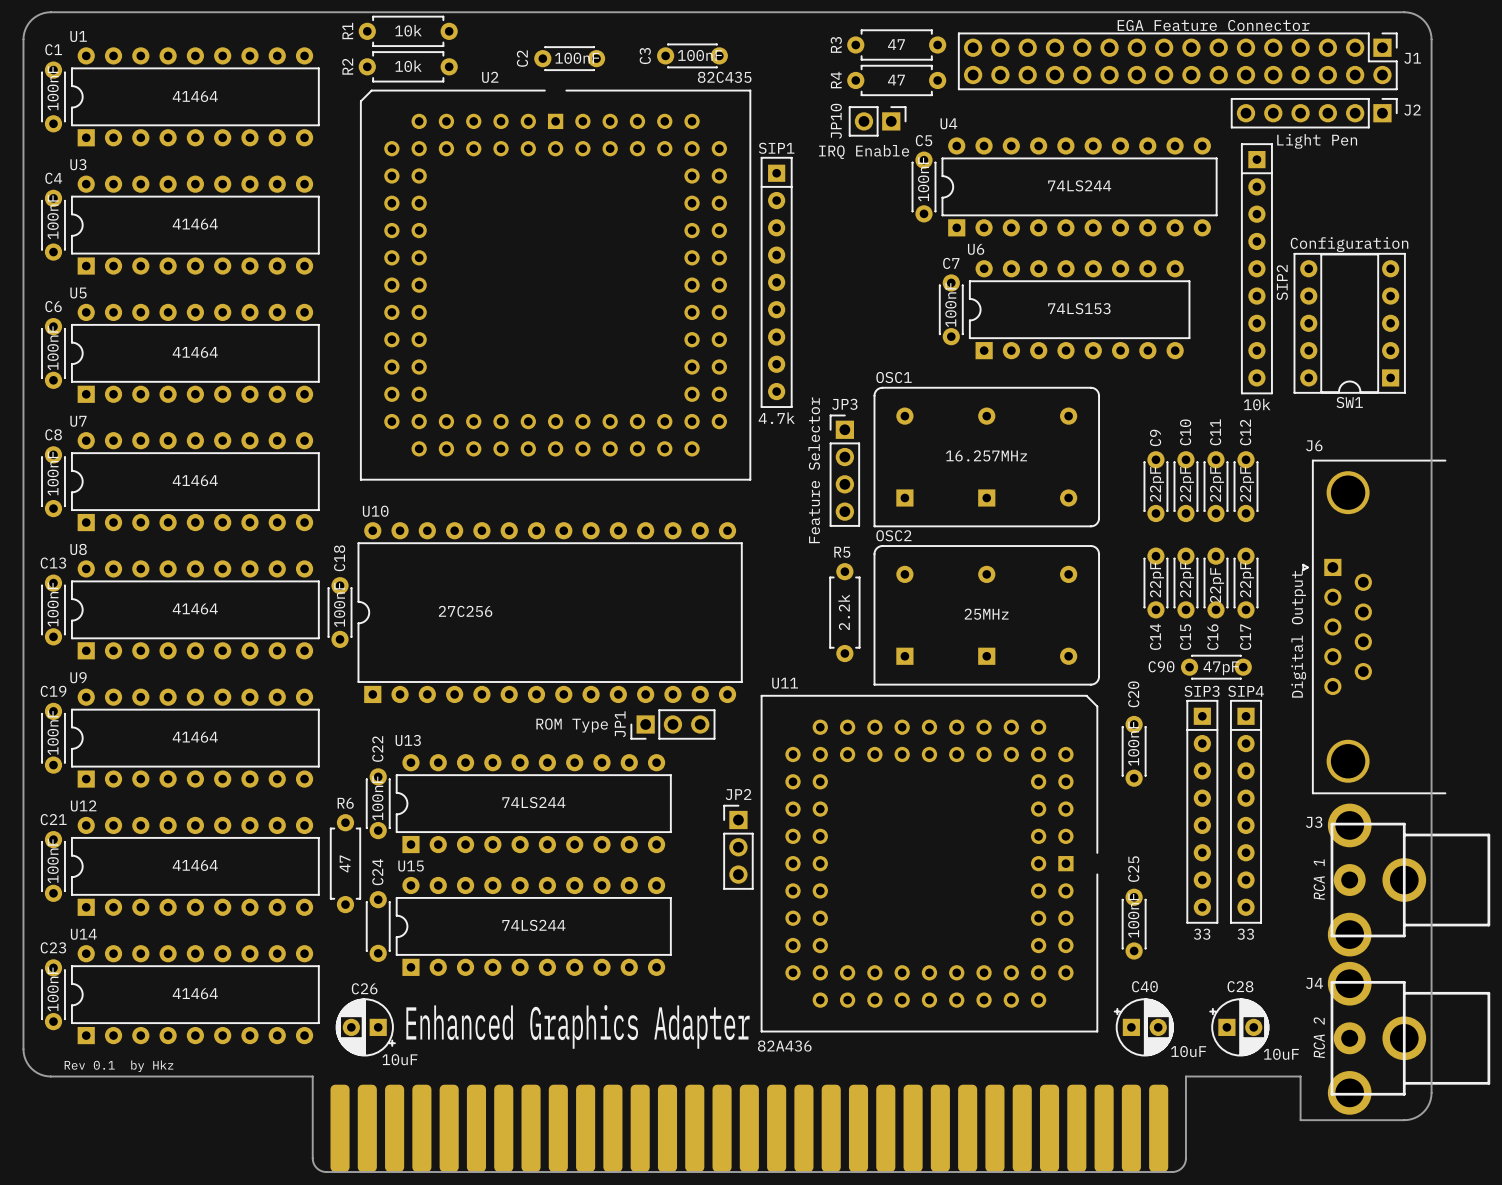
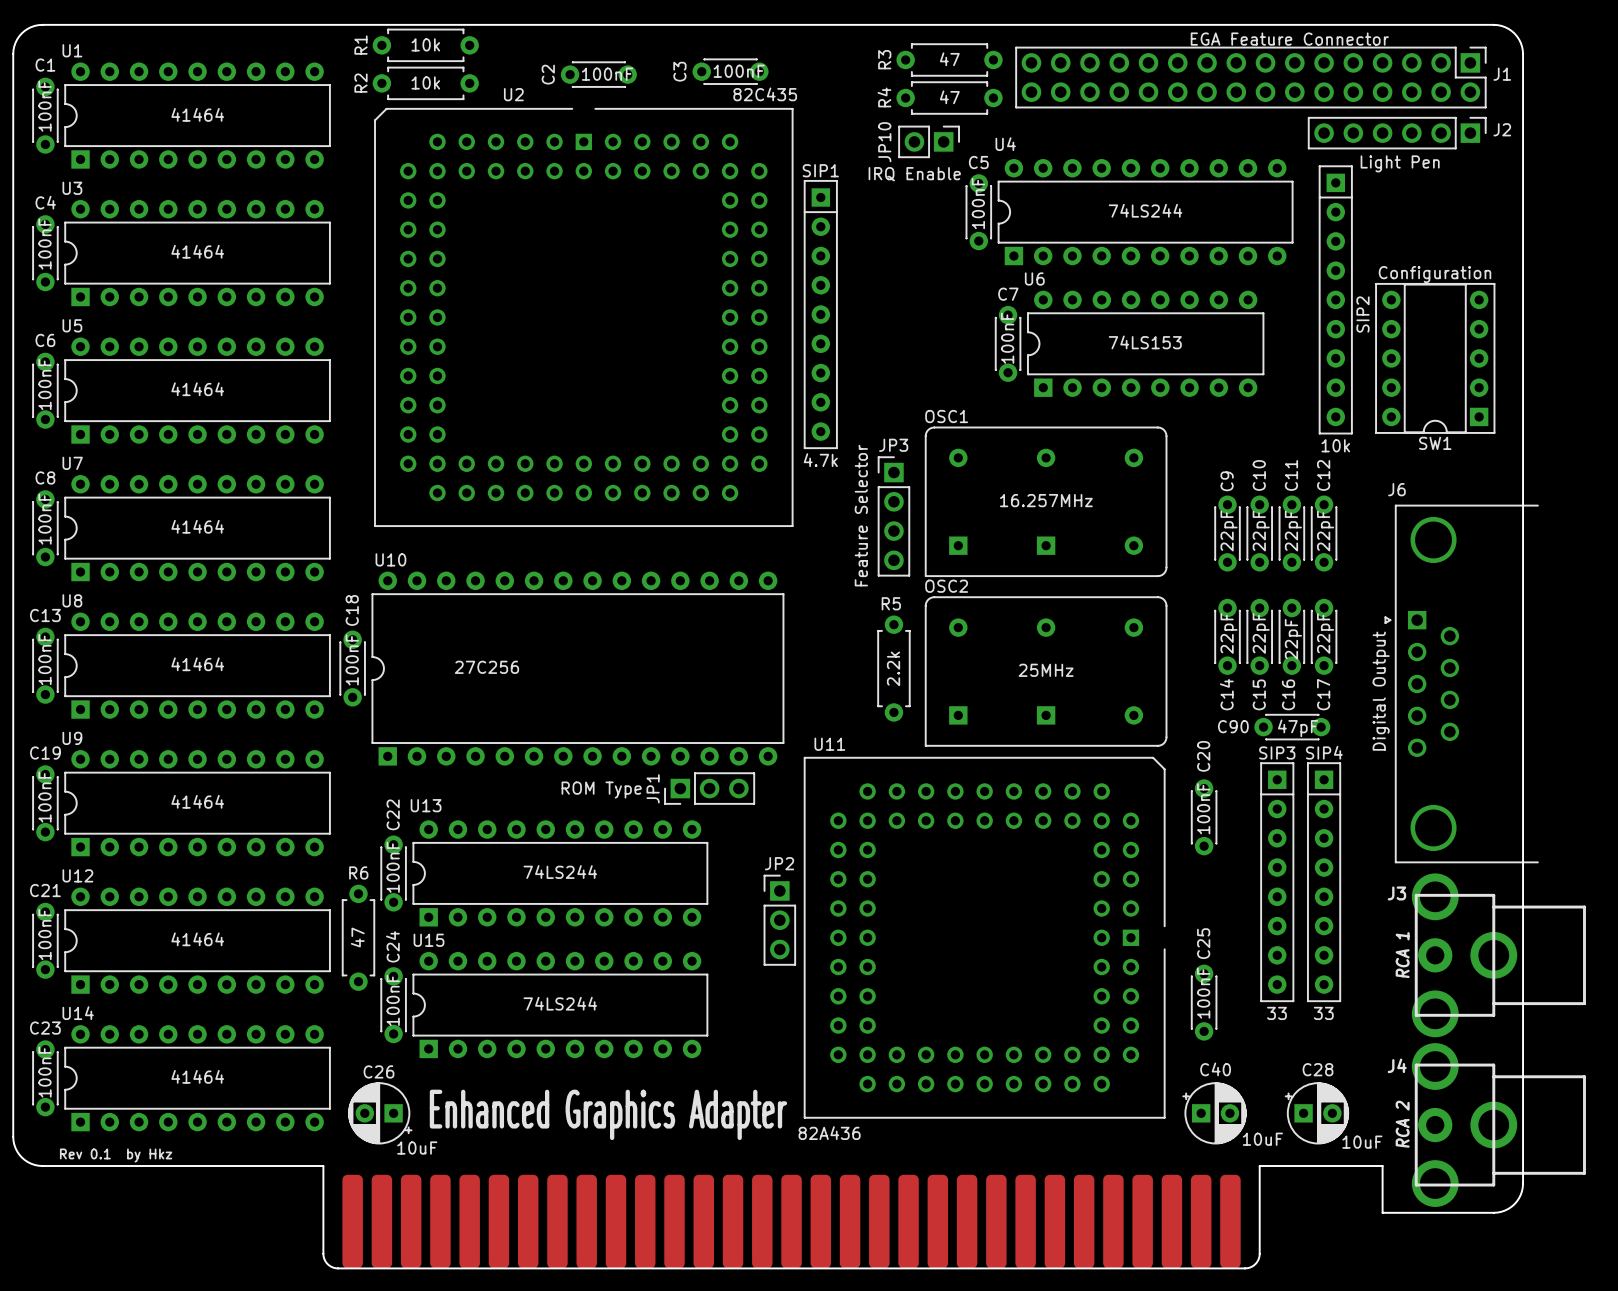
C24 value: none -> 100nF (393, 1000)

